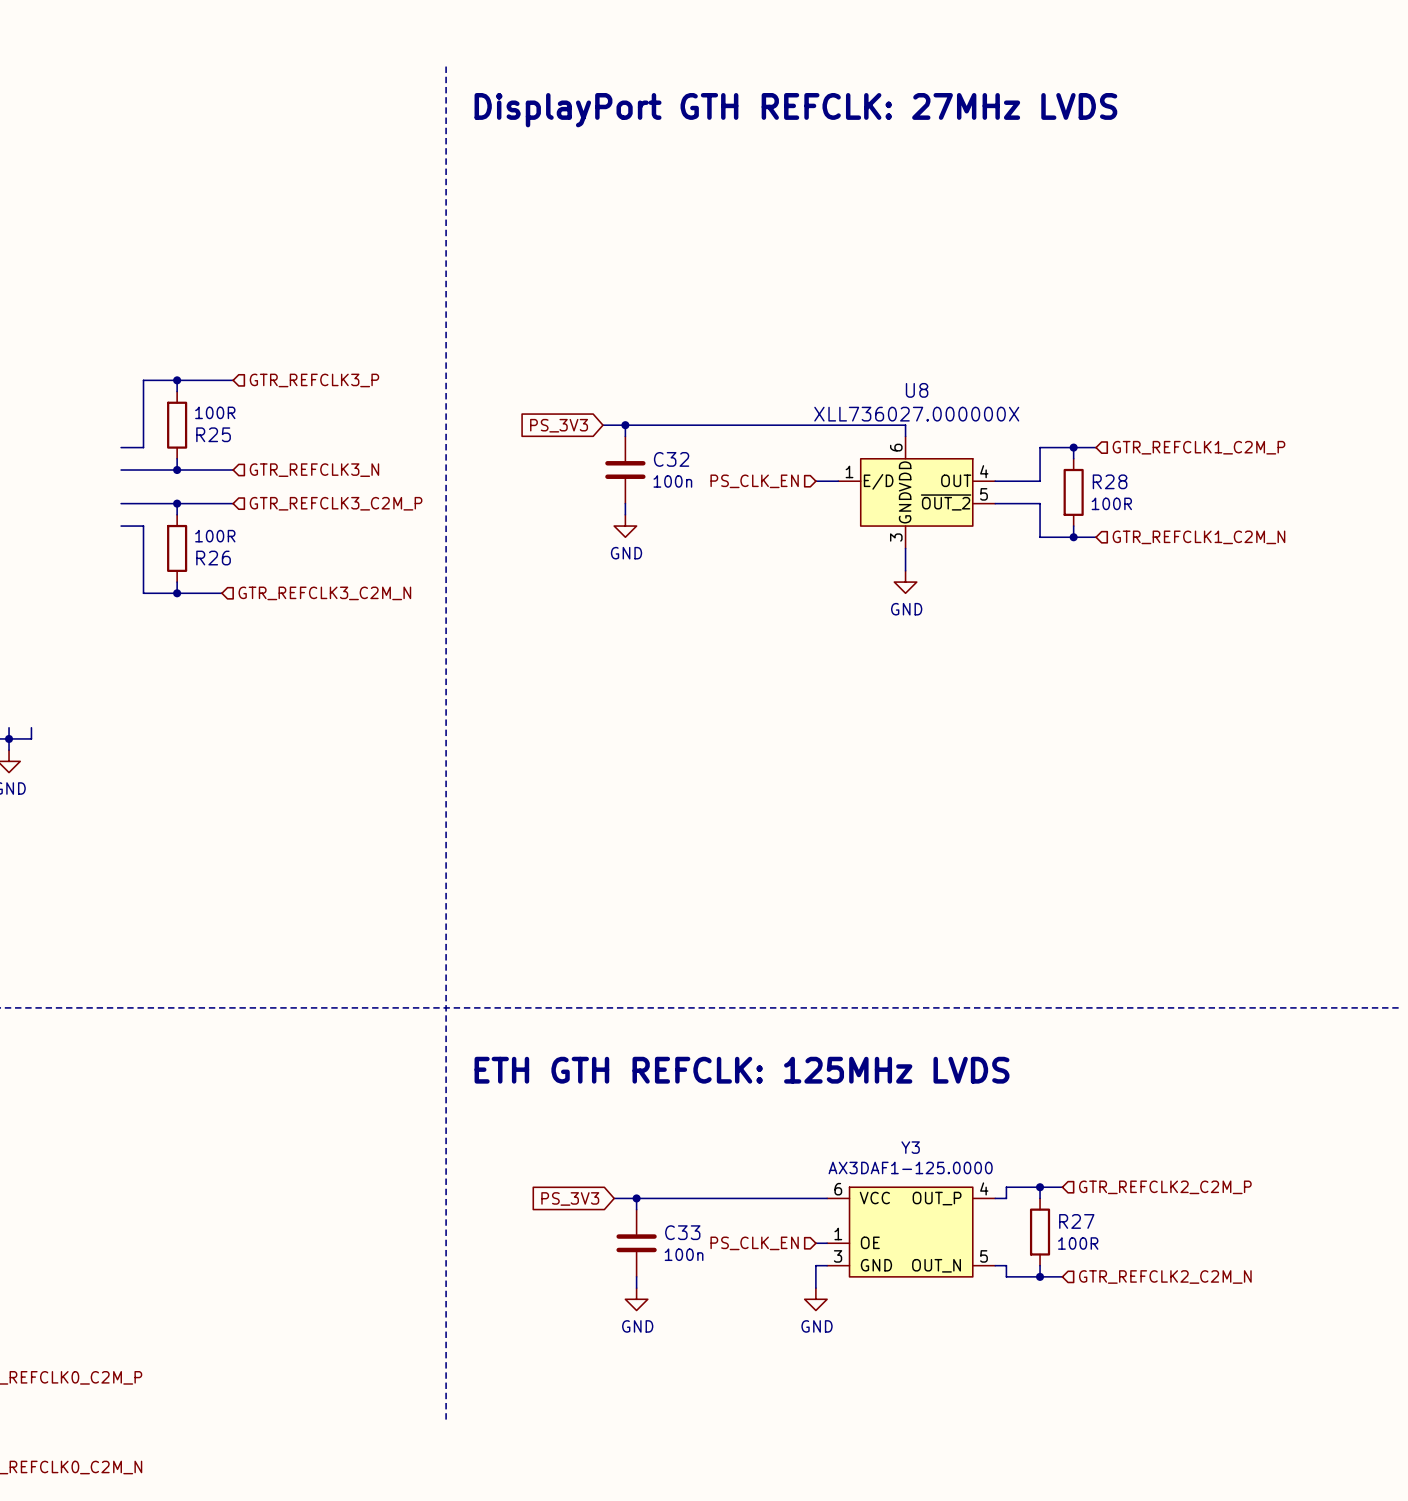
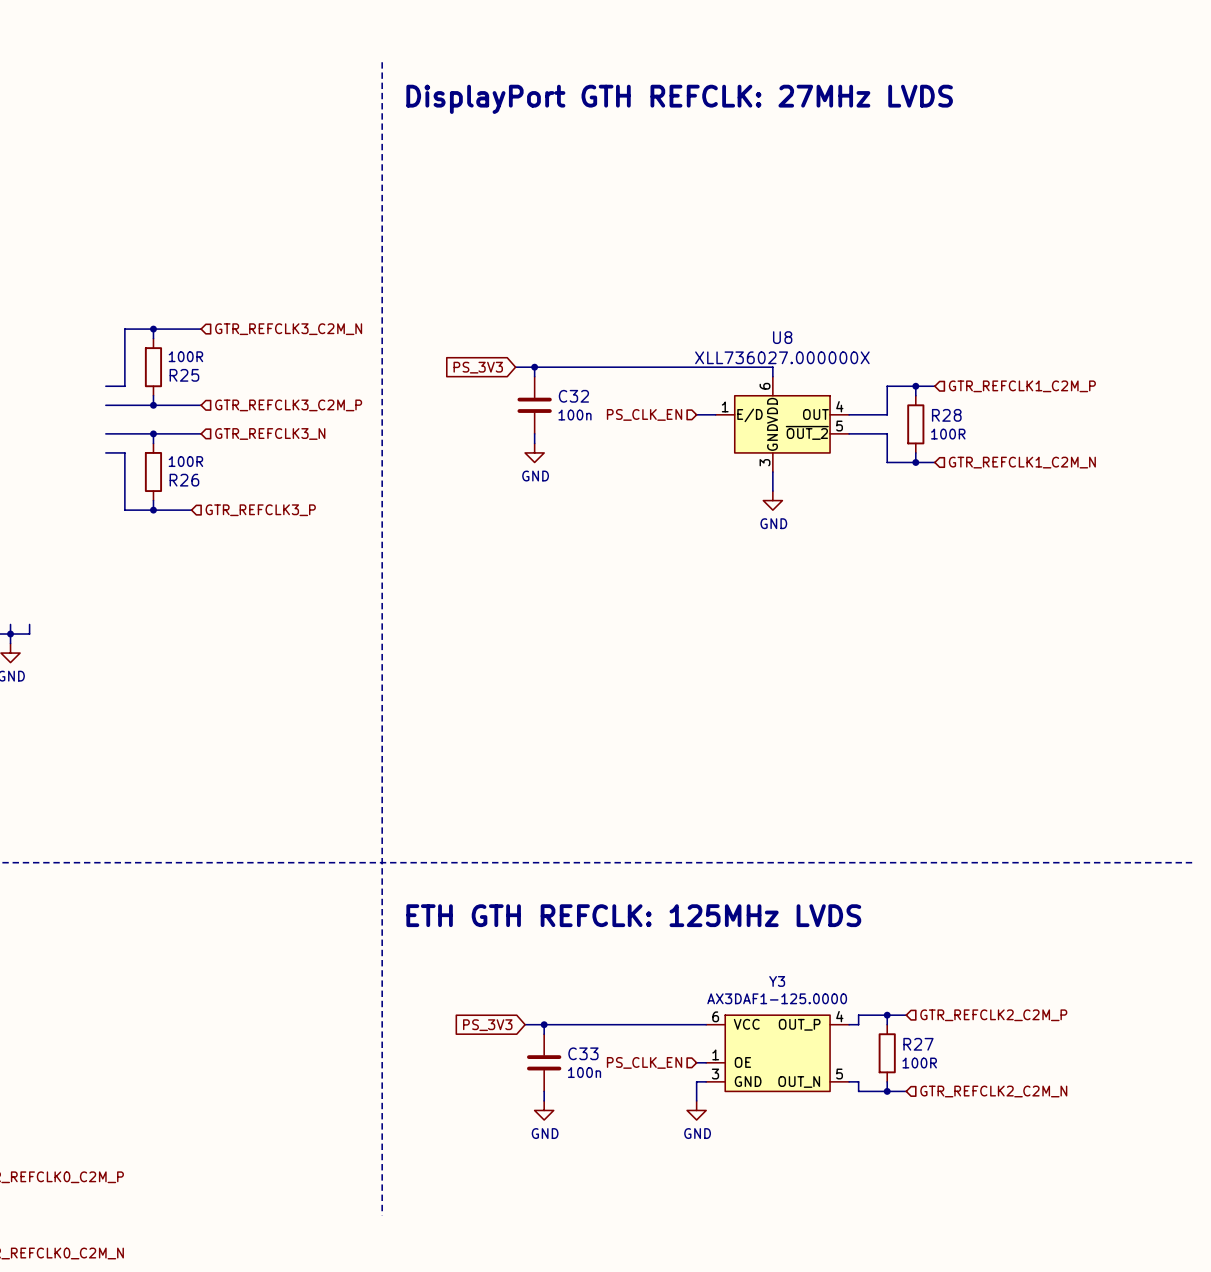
hierarchical label: GTR_REFCLK3_P (314, 380) -> GTR_REFCLK3_C2M_N (288, 329)
hierarchical label: GTR_REFCLK3_N (314, 470) -> GTR_REFCLK3_C2M_P (288, 405)
hierarchical label: GTR_REFCLK3_C2M_P (336, 503) -> GTR_REFCLK3_N (270, 433)
hierarchical label: GTR_REFCLK3_C2M_N (324, 593) -> GTR_REFCLK3_P (260, 510)

